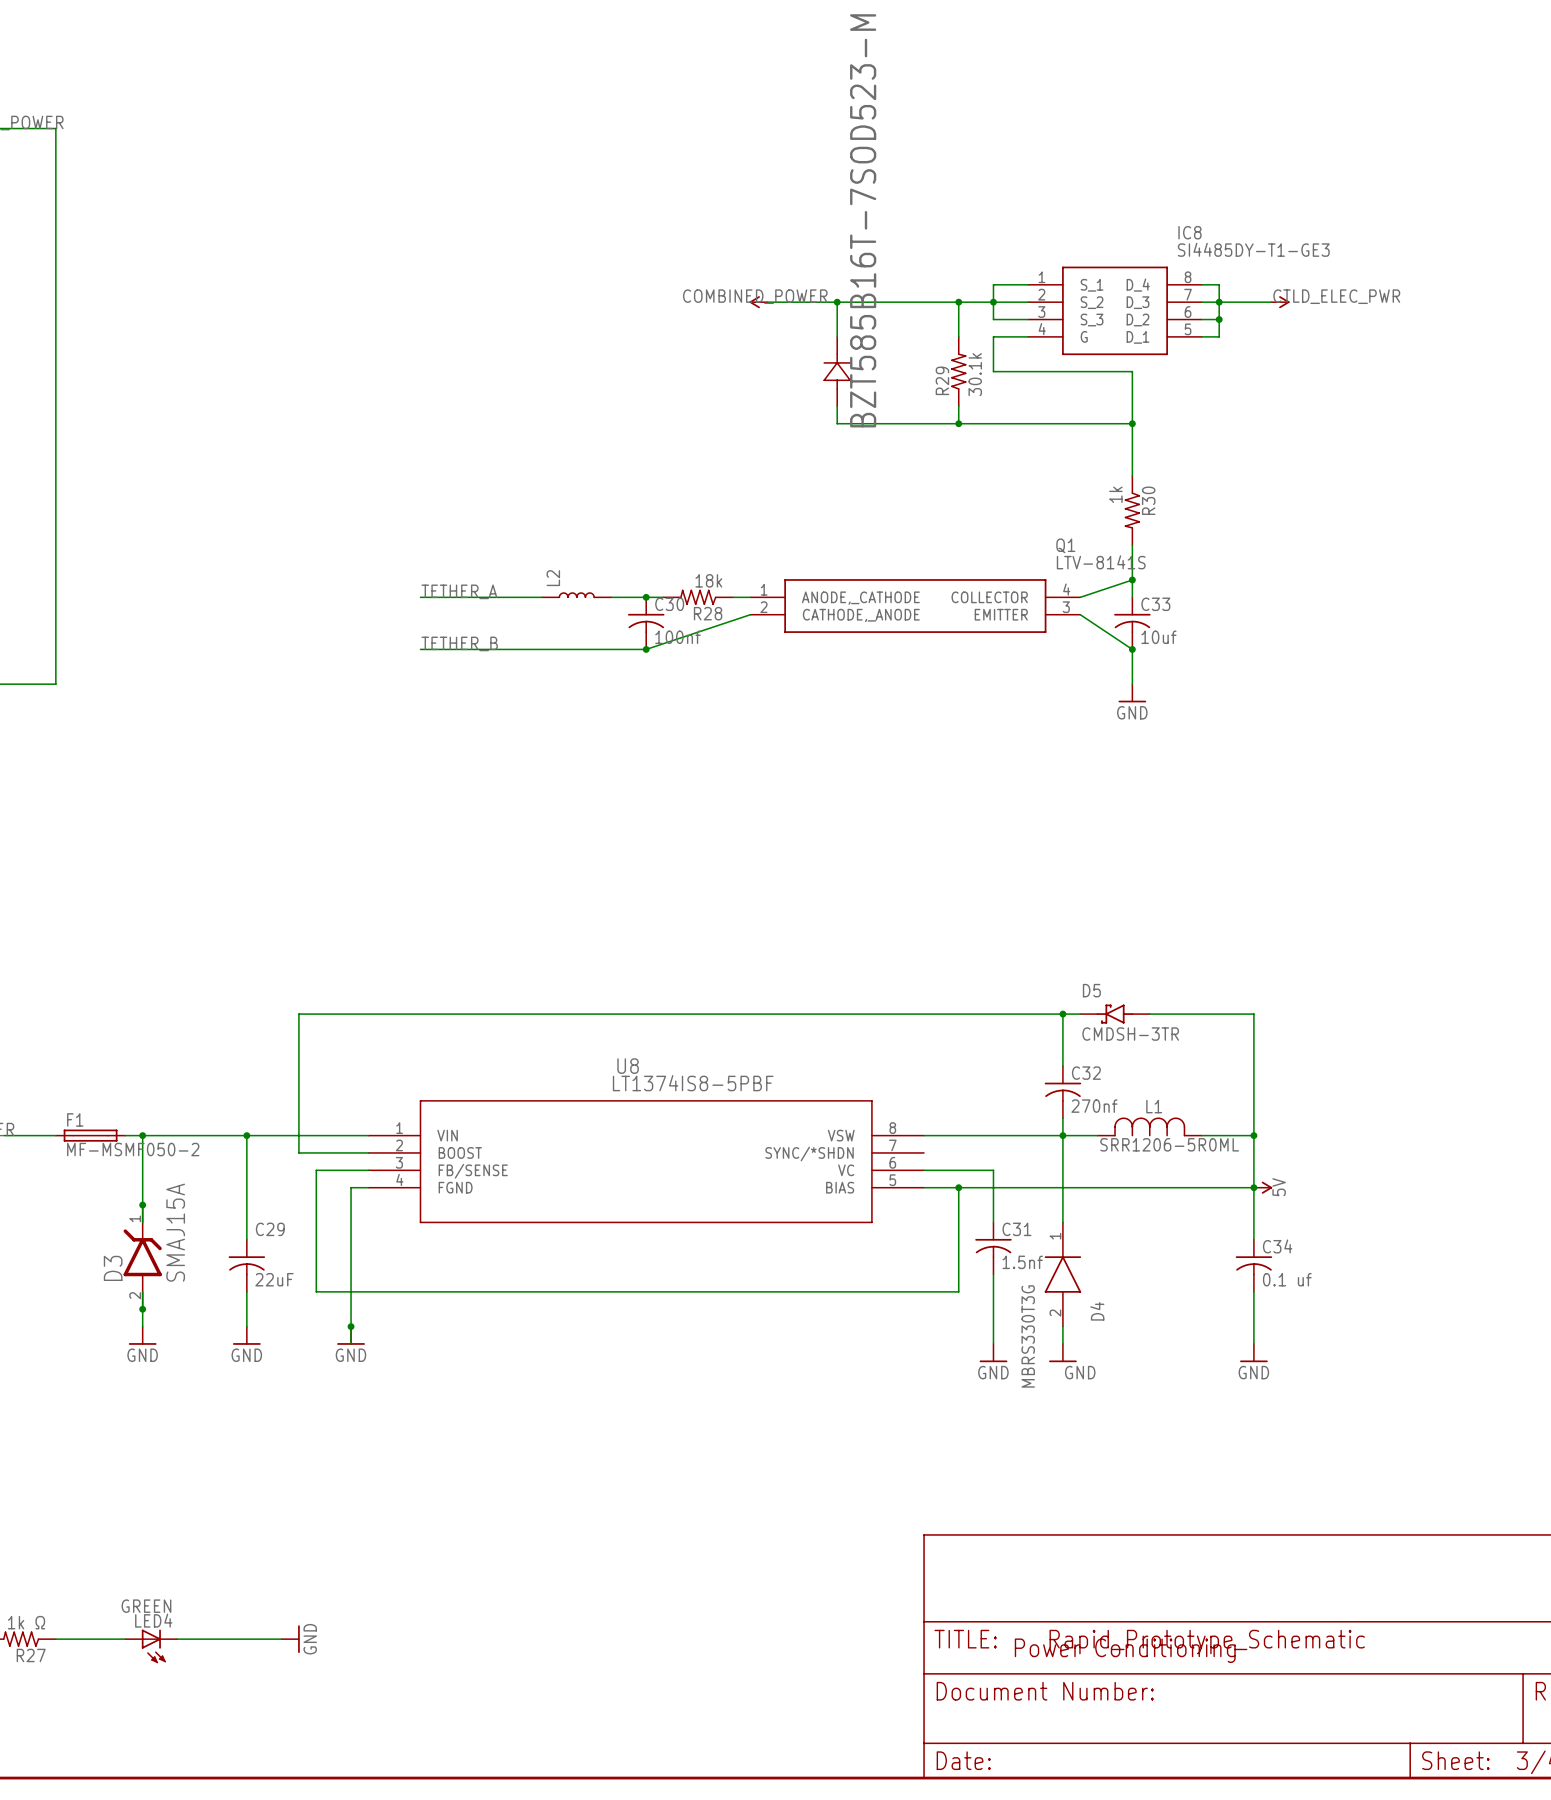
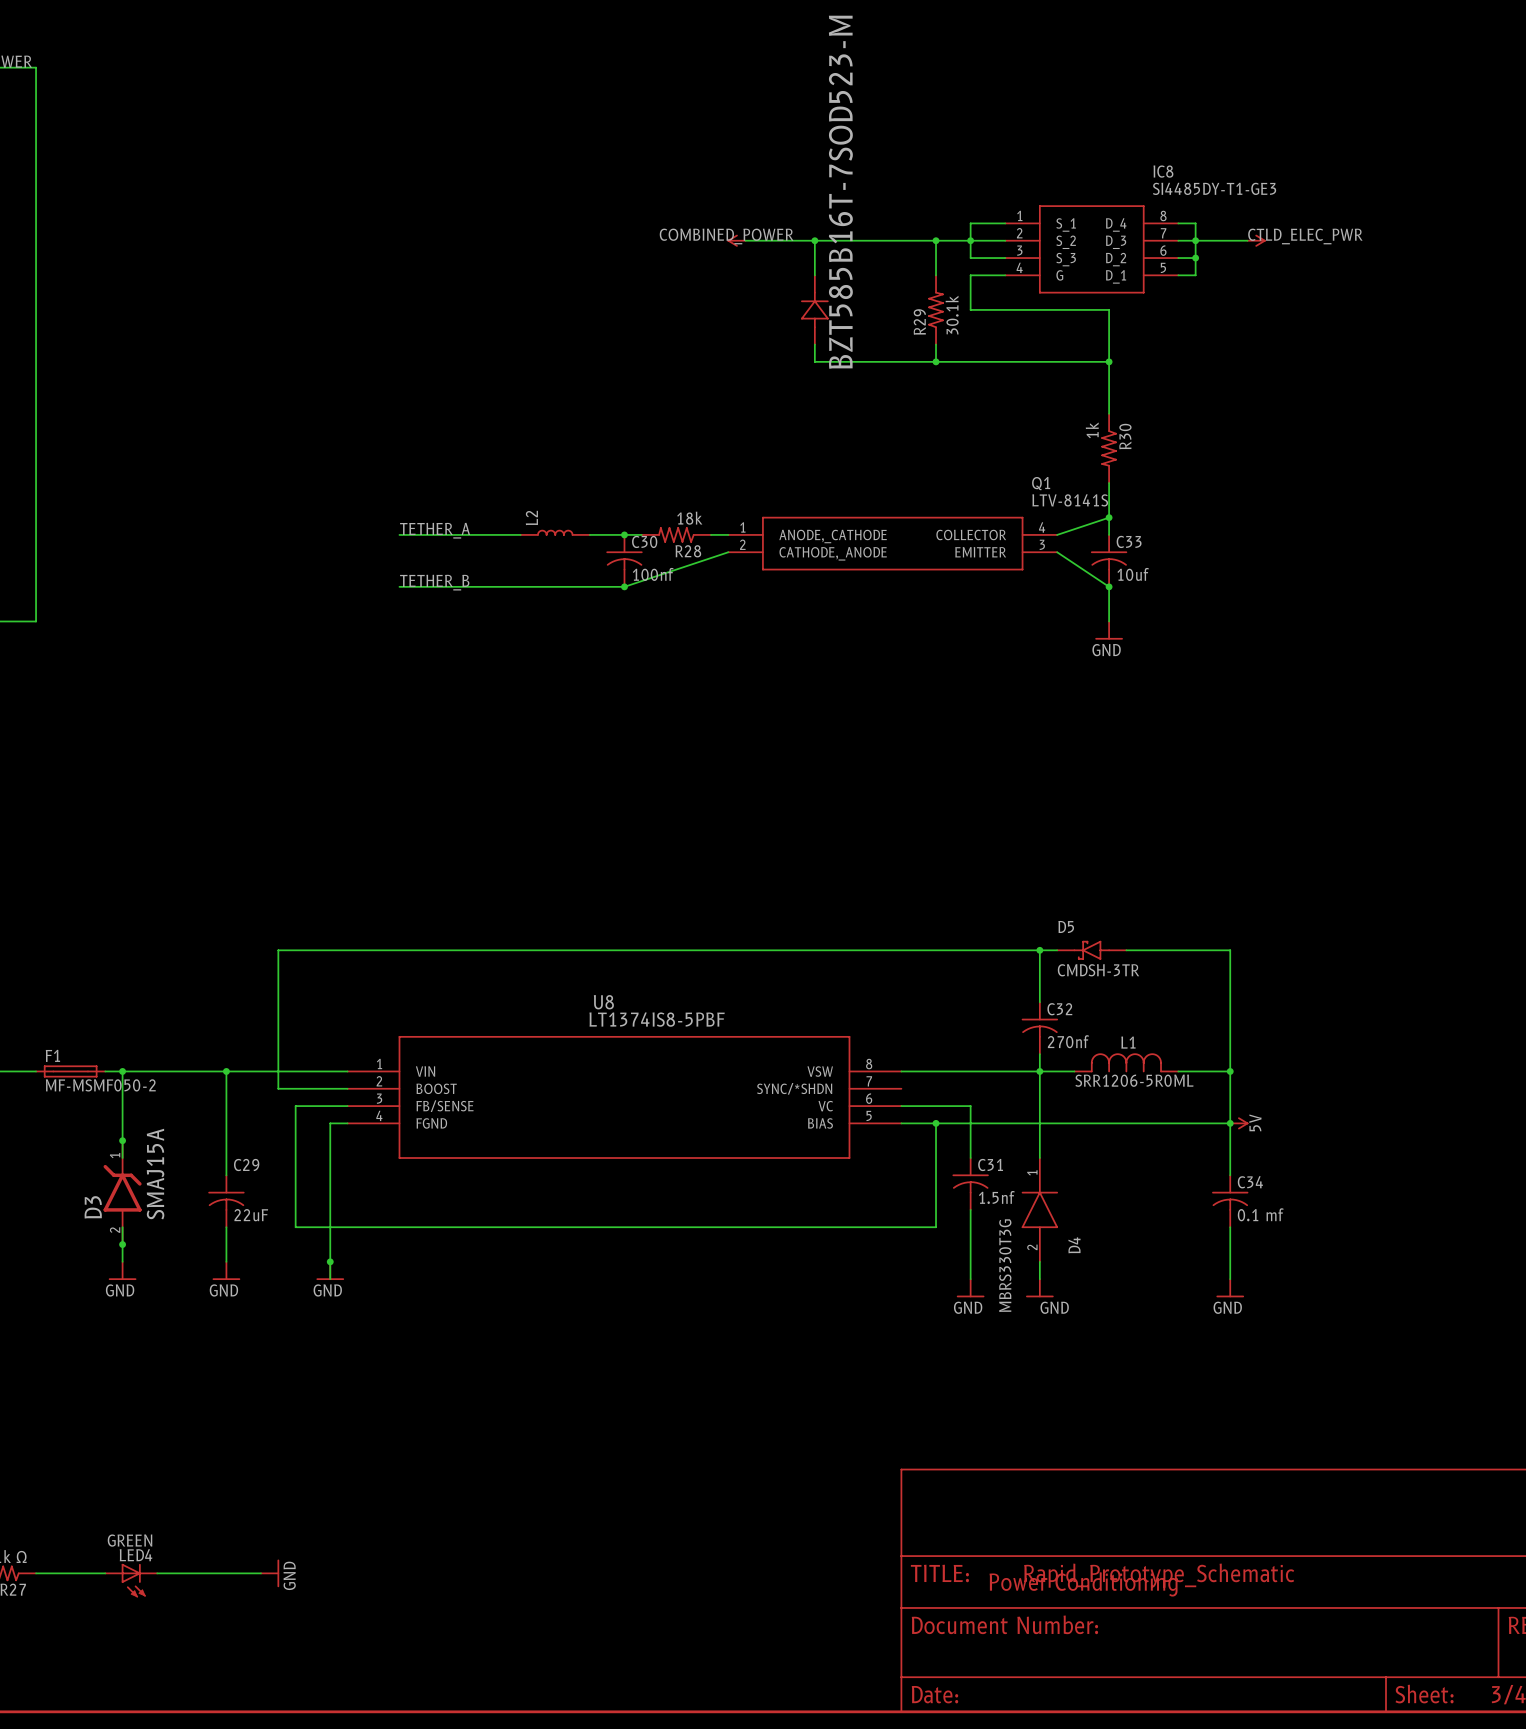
C34 value: 0.1 uf (1287, 1279) -> 0.1 mf (1260, 1214)

